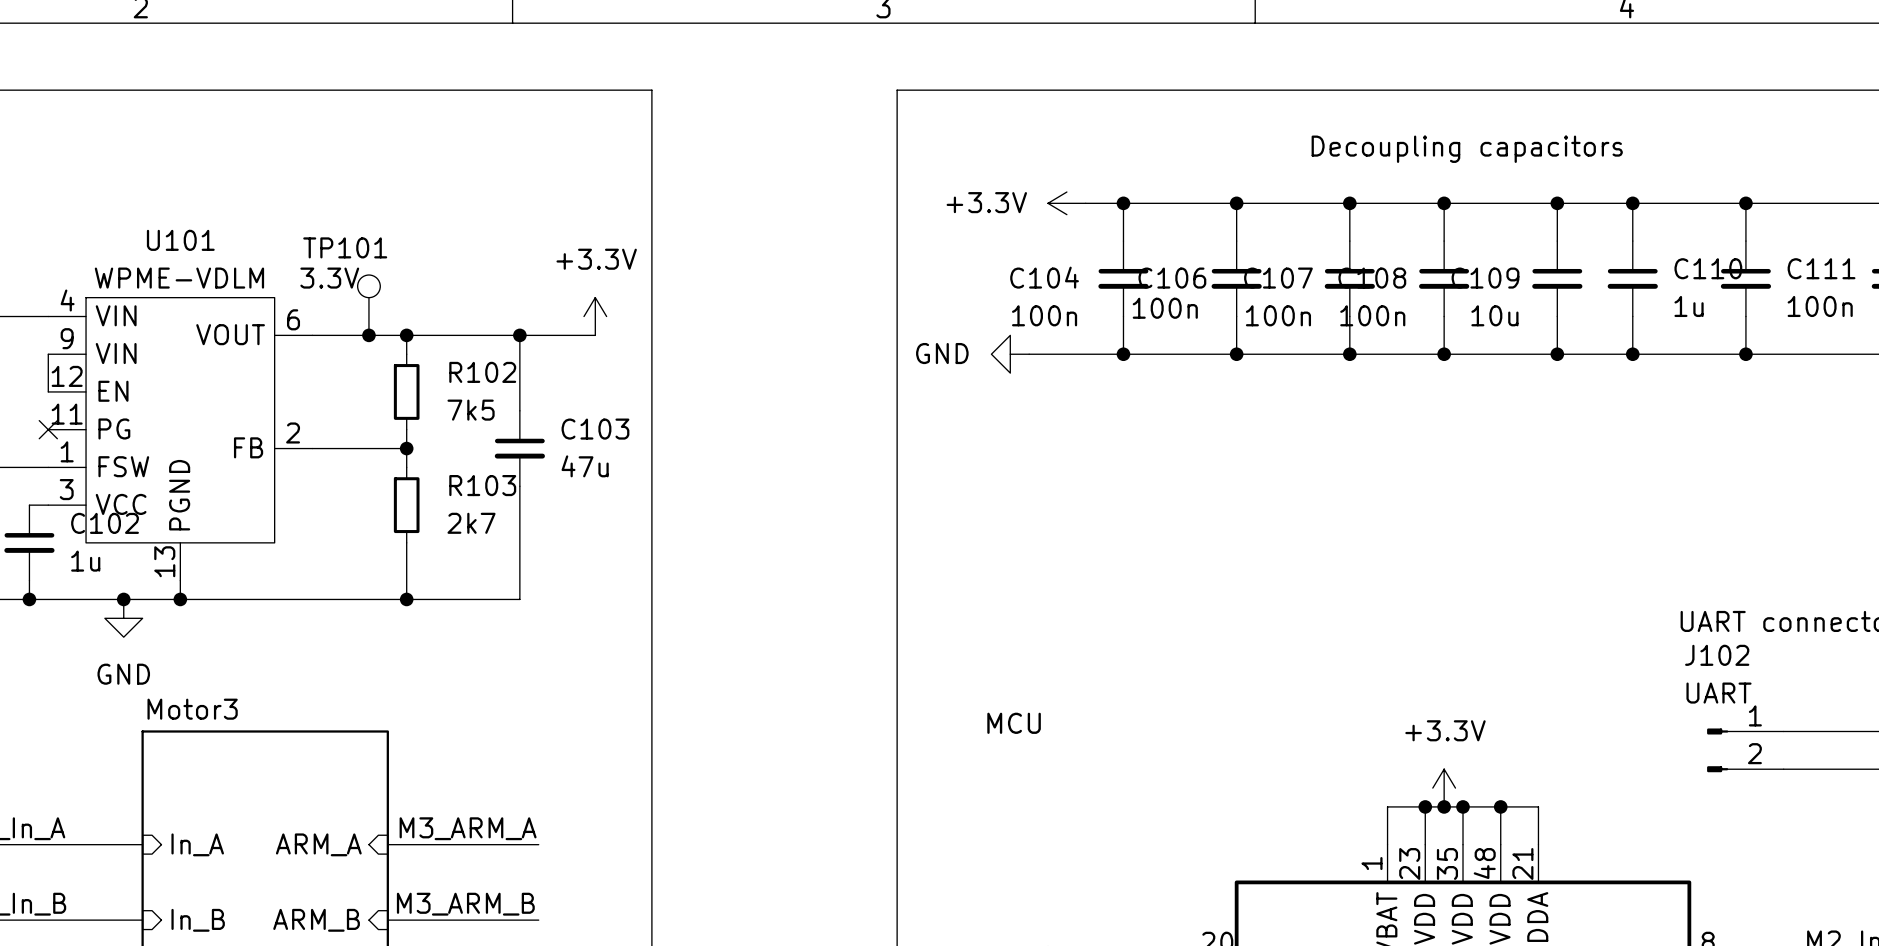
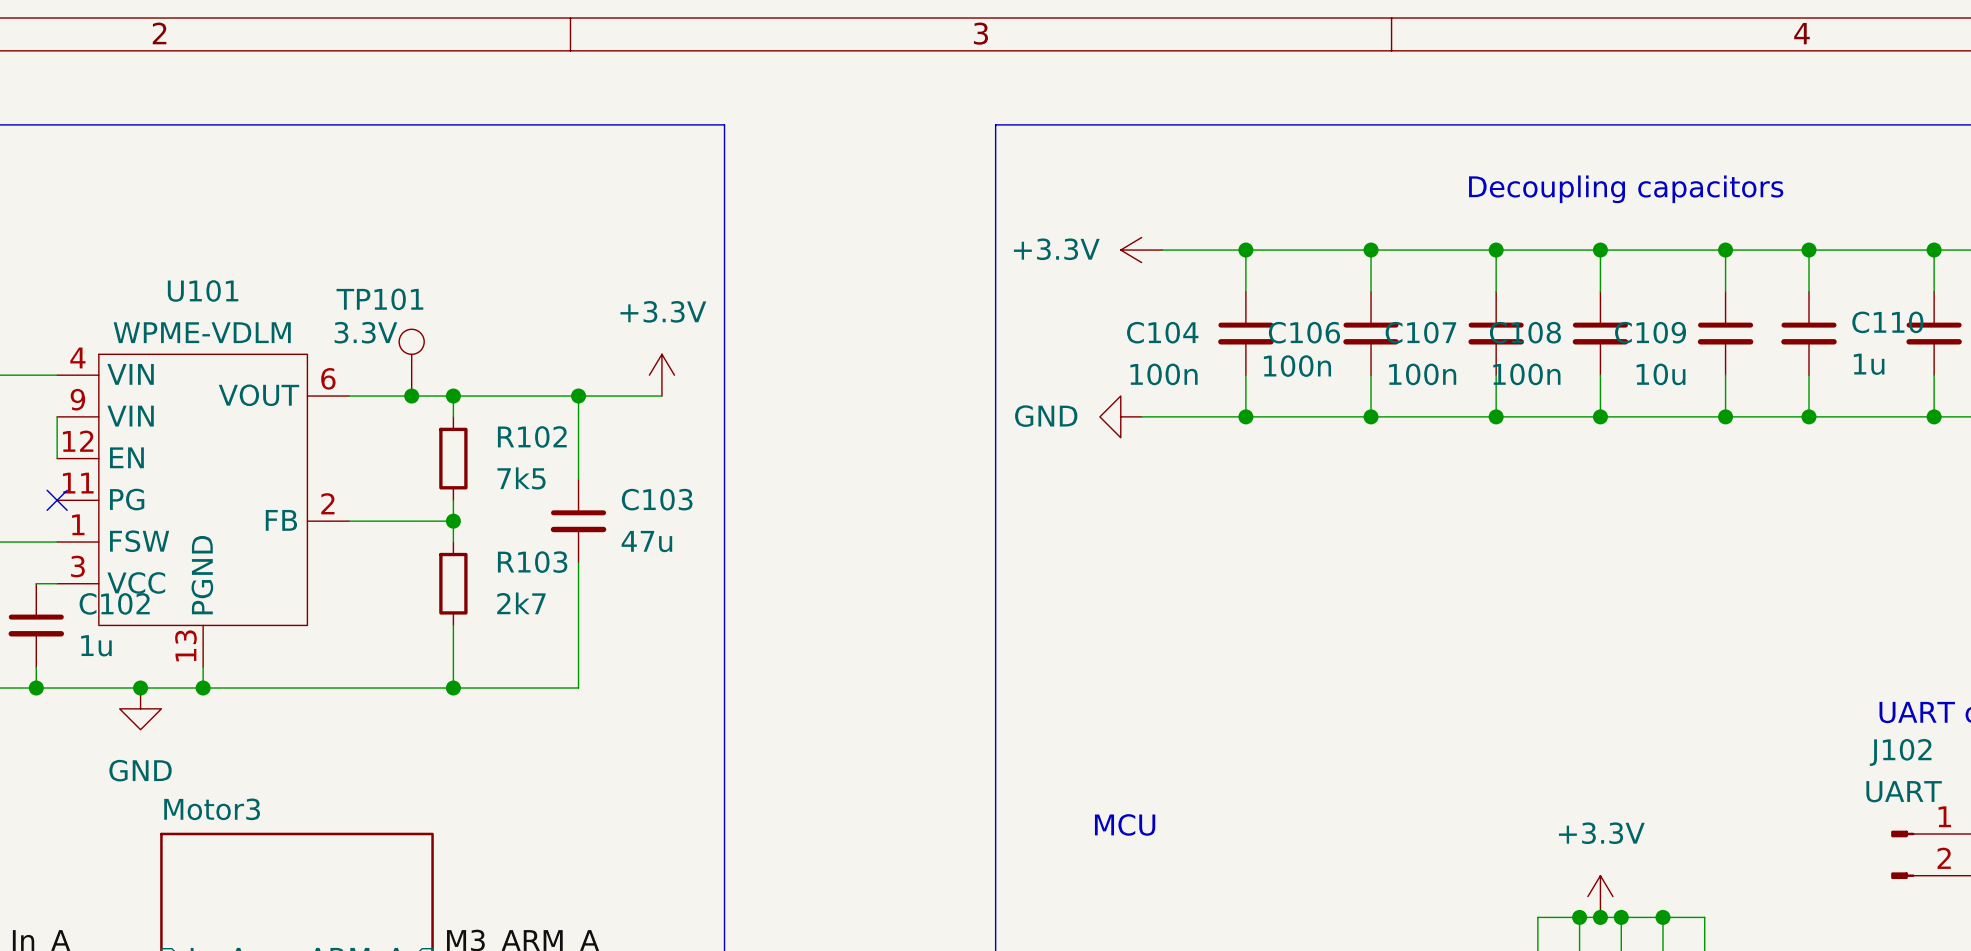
power symbol position: +3.3V (1066, 203) -> +3.3V (1141, 250)

